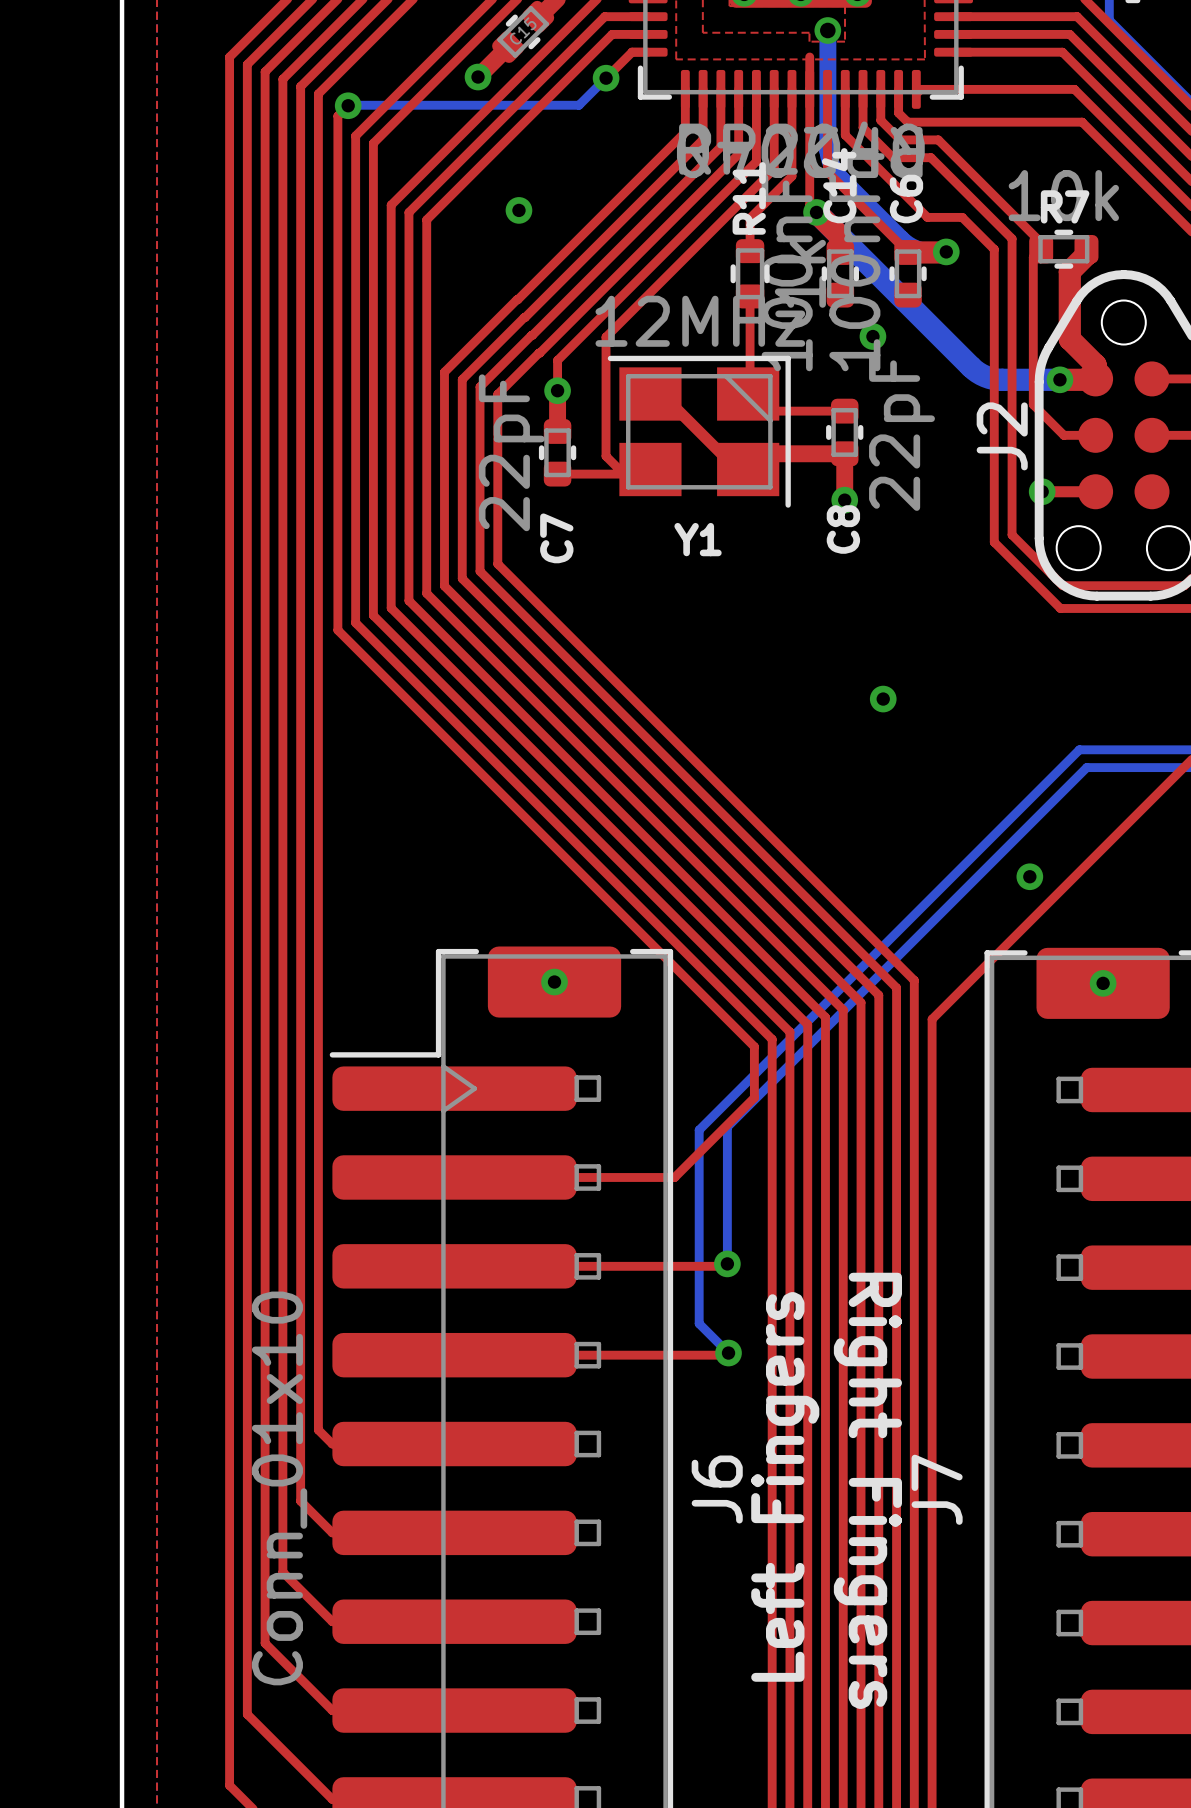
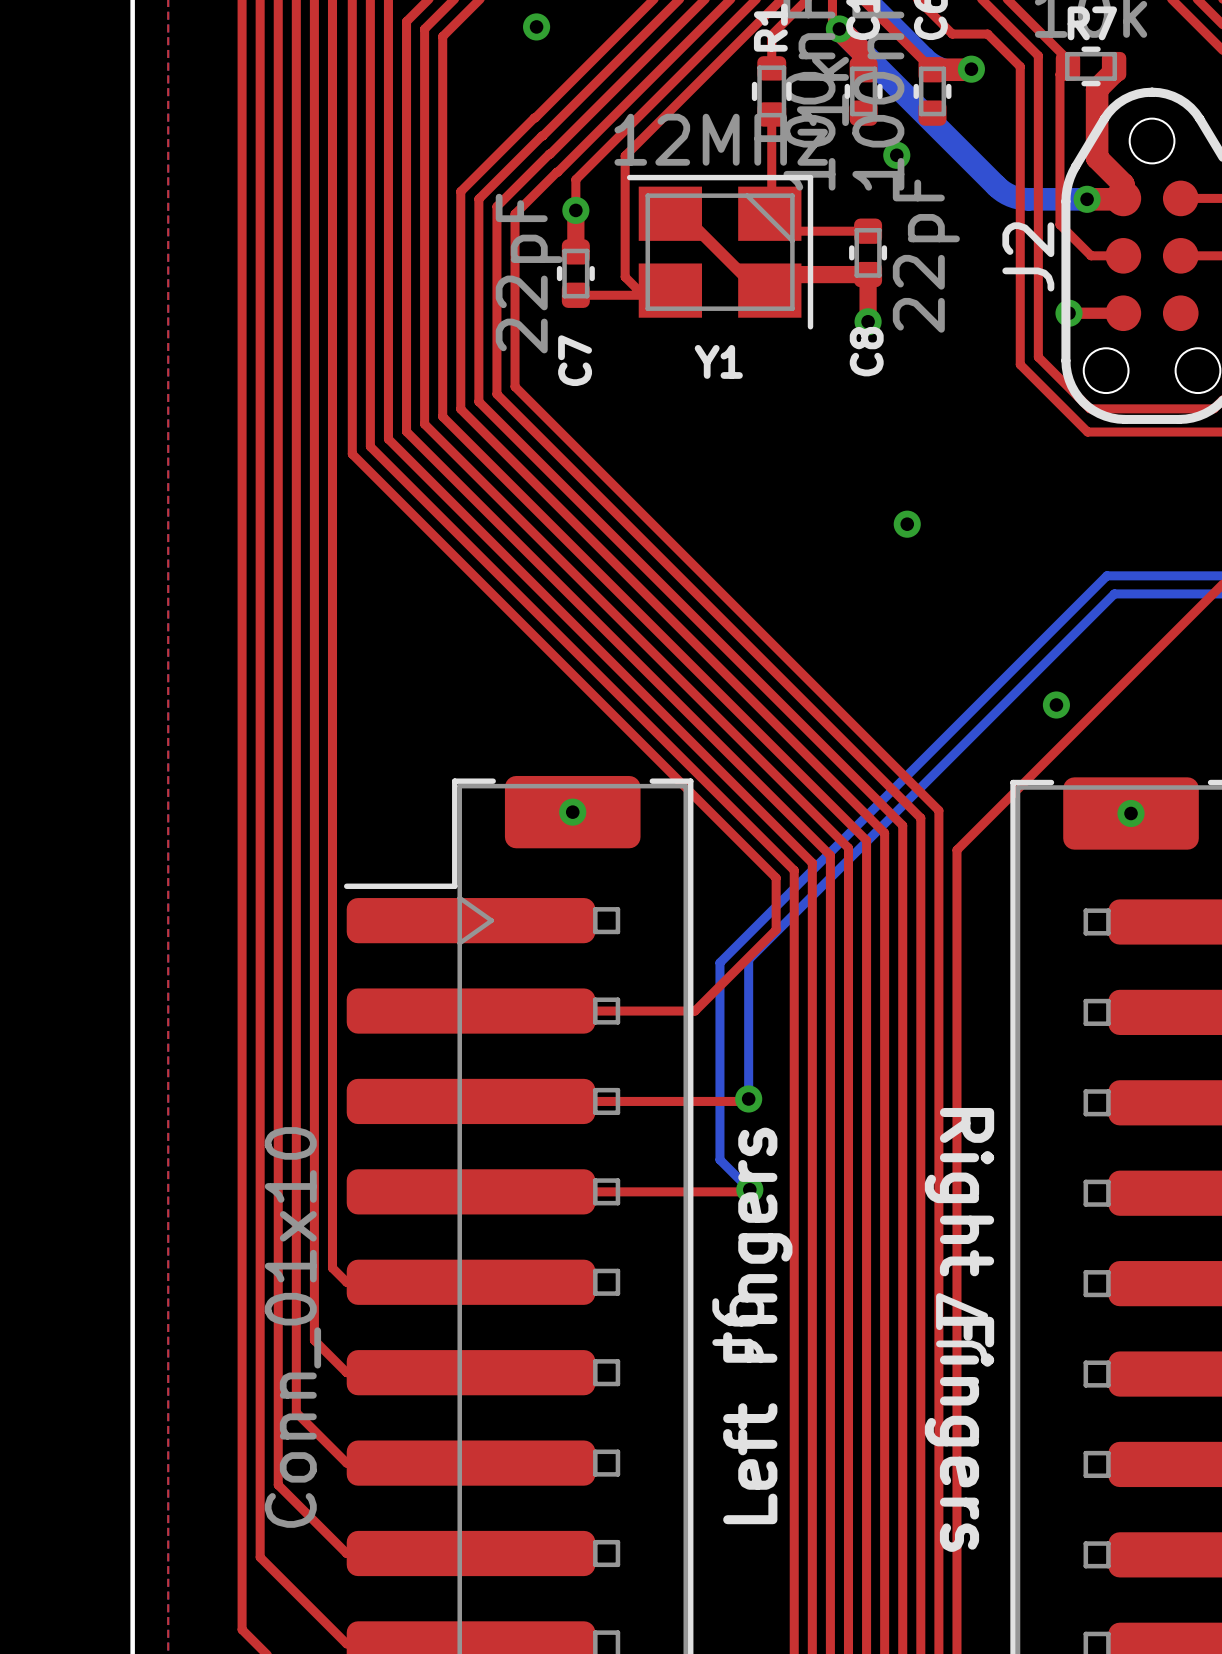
text position: Left Fingers (785, 1486) -> Left Fingers (757, 1325)
text position: Right Fingers (867, 1490) -> Right Fingers (959, 1329)

